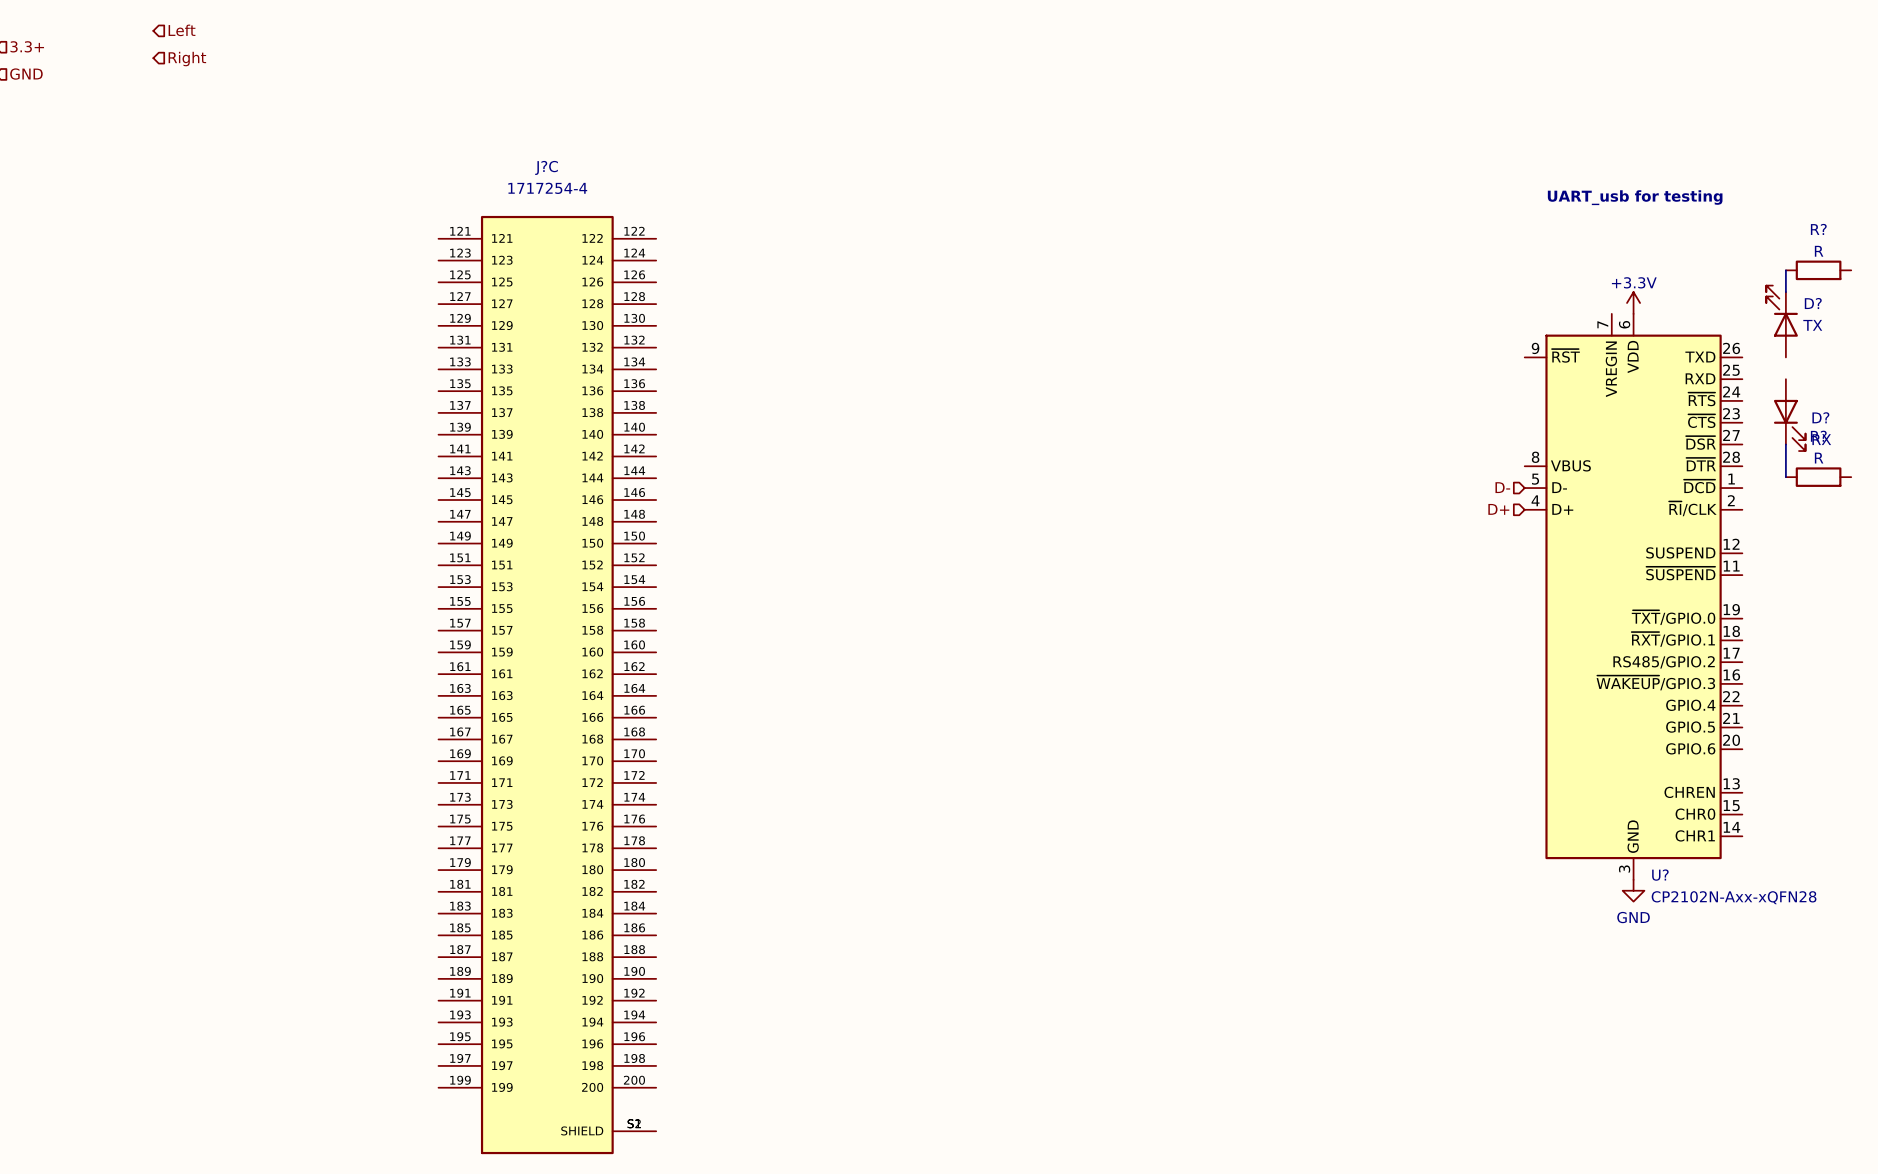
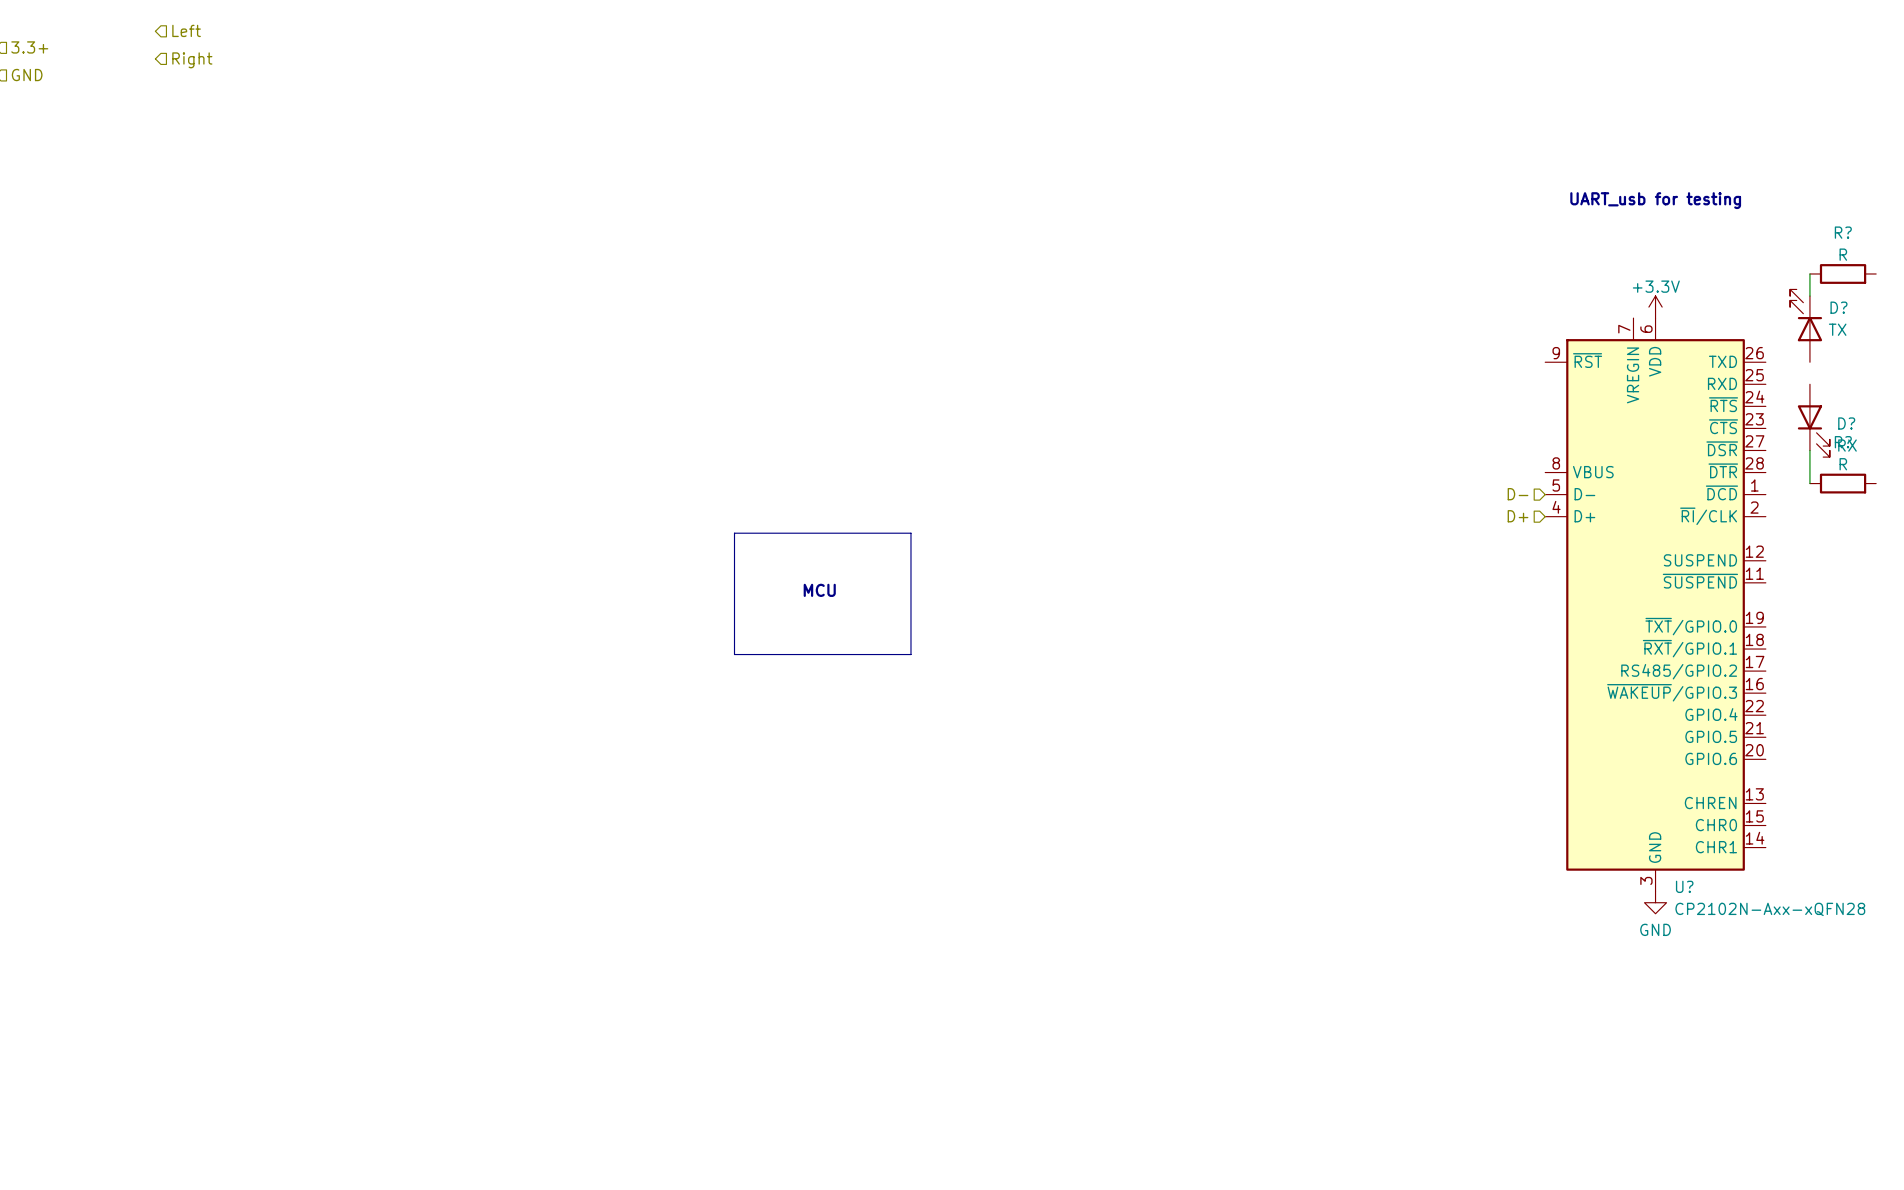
line: none -> (734, 533) (734, 654) (910, 654) (910, 533) (734, 533)
text: none -> MCU (819, 590)
J?C: 1717254-4 (547, 685) -> none

